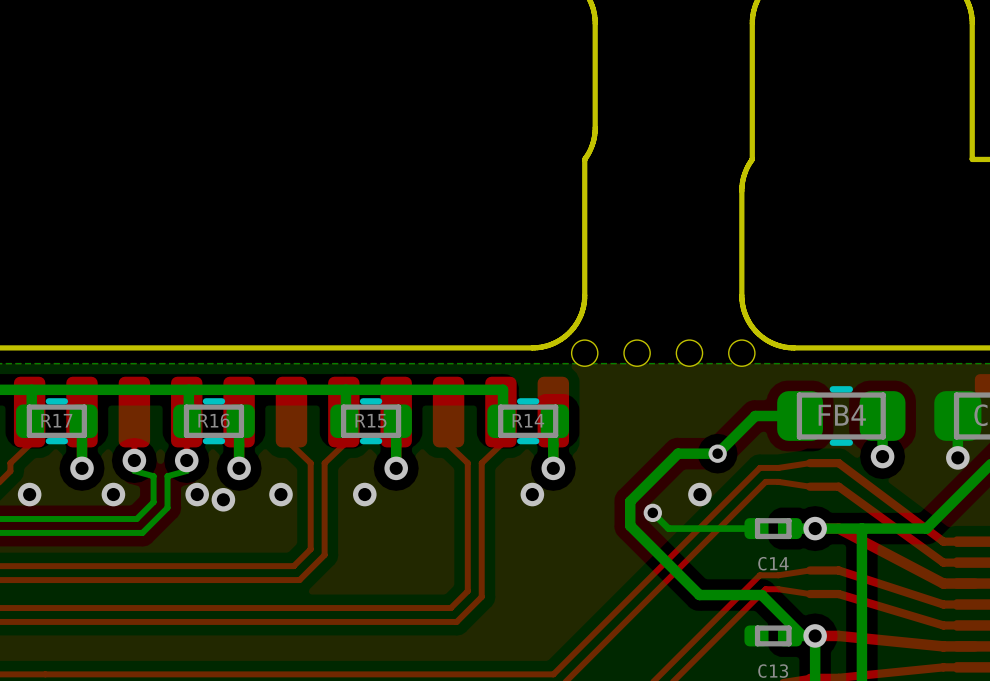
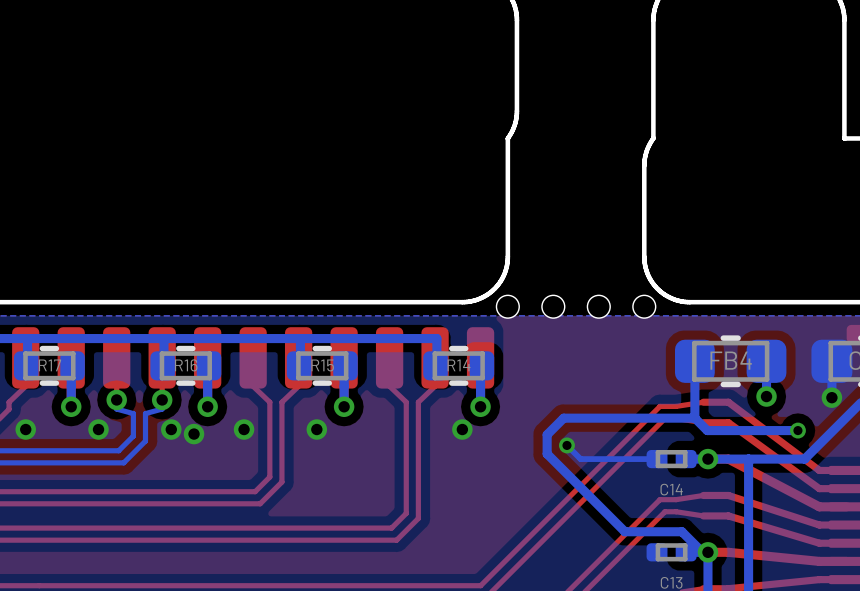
bottom track: (800, 415) (755, 415) (717, 453) (678, 453) (630, 501) (630, 525) (699, 595) (761, 595) (802, 635) -> (694, 361) (694, 418)
via position: (717, 453) -> (797, 430)
bottom track: none -> (694, 418) (707, 430) (797, 430)
bottom track: none -> (694, 418) (563, 418) (547, 434) (547, 453) (624, 531) (681, 531) (702, 552)
via: (699, 494) -> none

